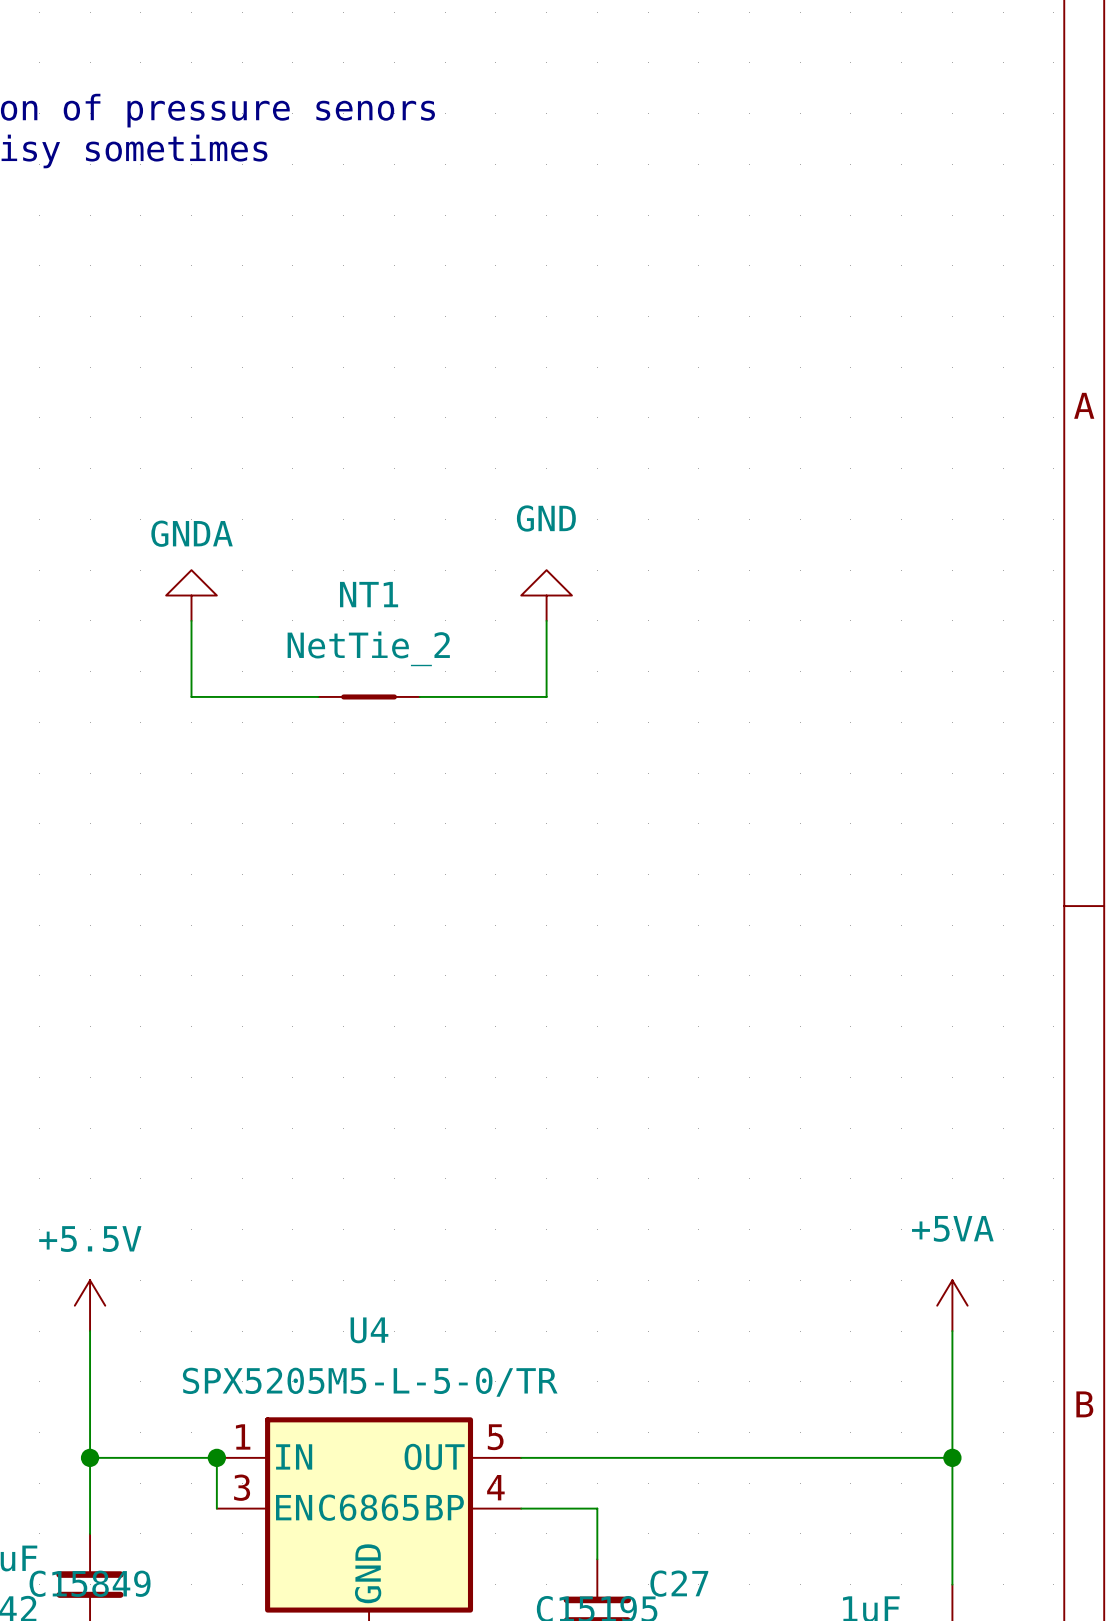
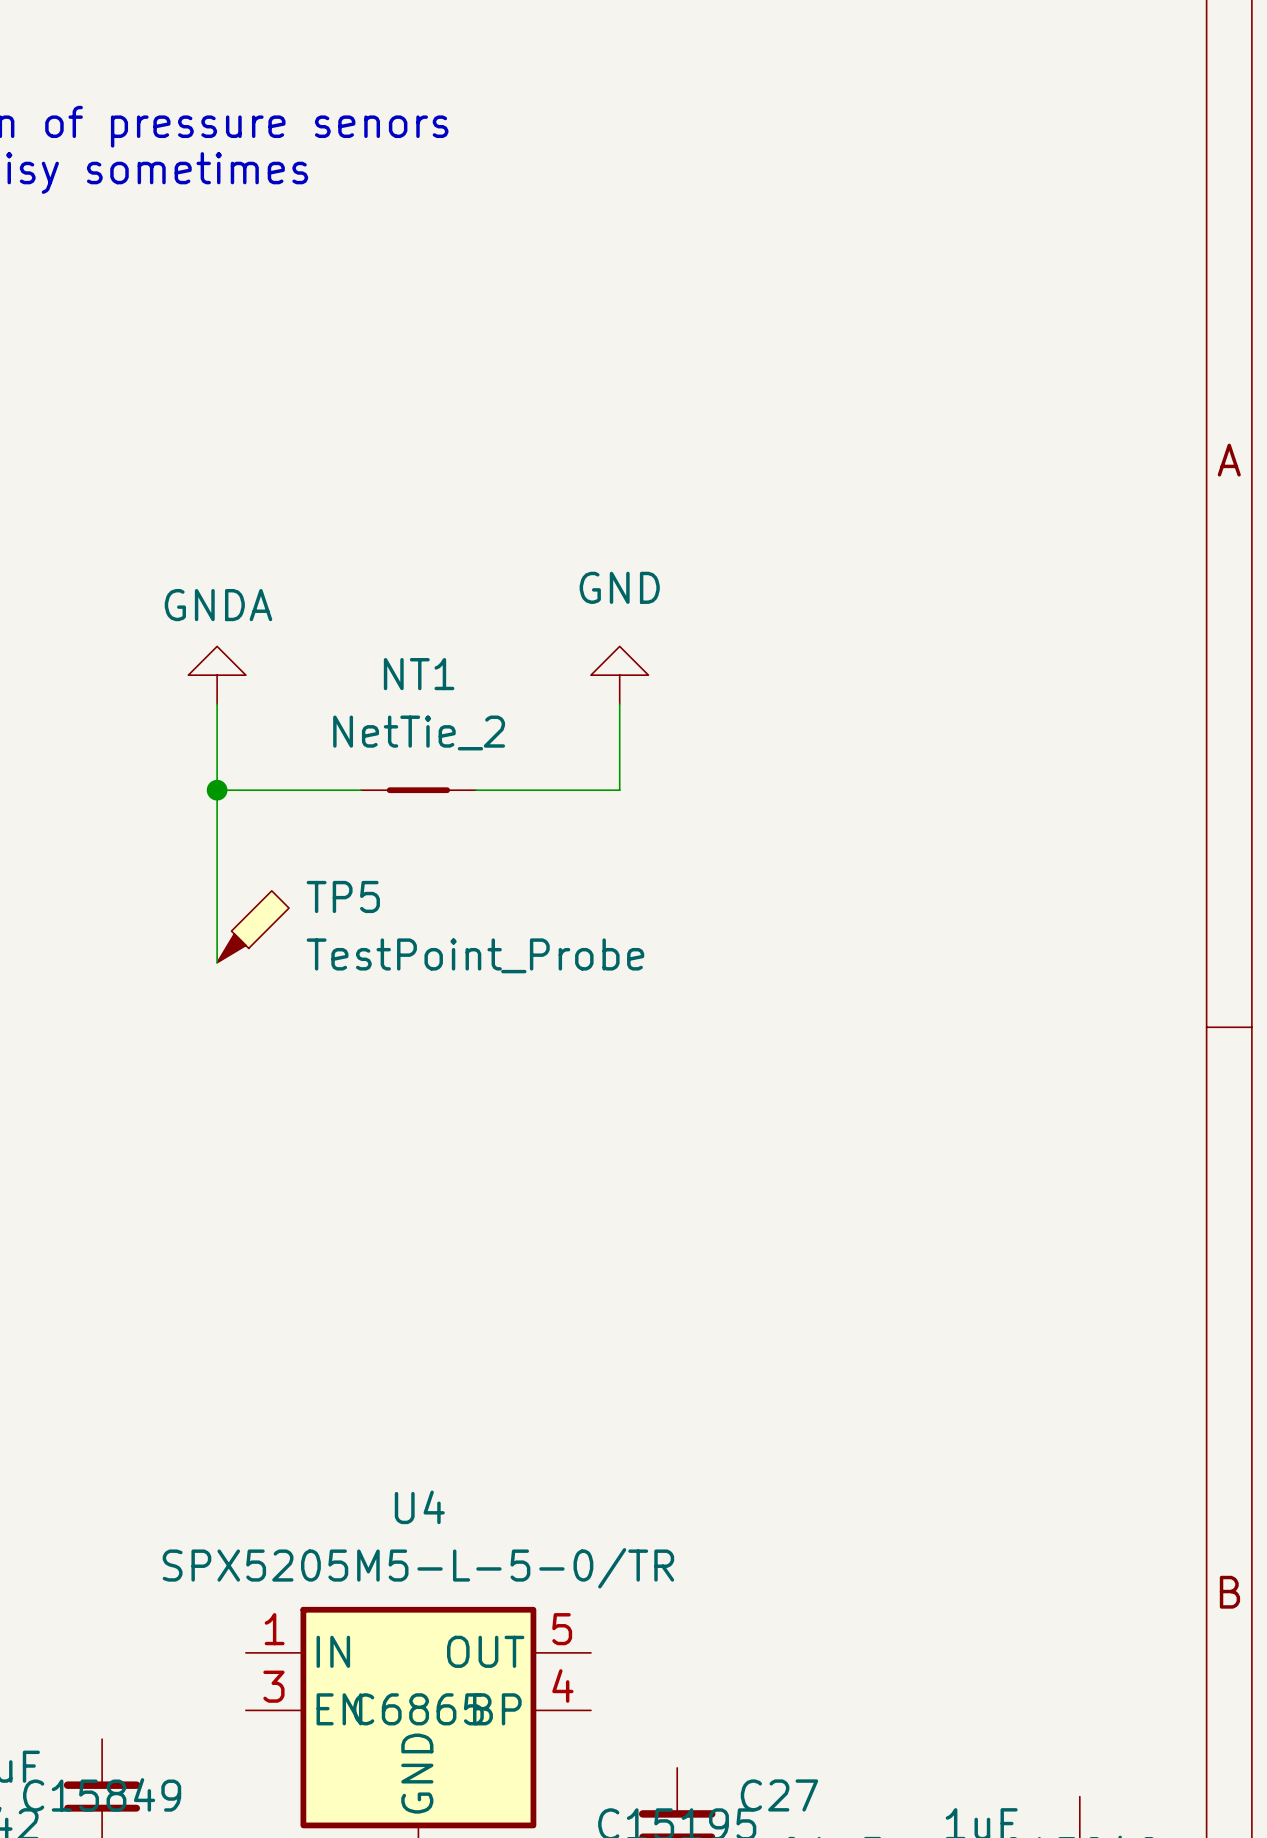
wire: none -> (217, 790) (217, 962)
junction: none -> (217, 790)
TP5: none -> TestPoint_Probe (253, 926)
power symbol: +5.5V (90, 1305) -> none
power symbol: +5VA (952, 1305) -> none
wire: (90, 1331) (90, 1533) -> none
wire: (952, 1331) (952, 1584) -> none
wire: (90, 1457) (216, 1457) (216, 1508) -> none
junction: (90, 1457) -> none
junction: (216, 1457) -> none
wire: (521, 1457) (952, 1457) -> none
junction: (952, 1457) -> none
wire: (521, 1508) (597, 1508) (597, 1559) -> none

